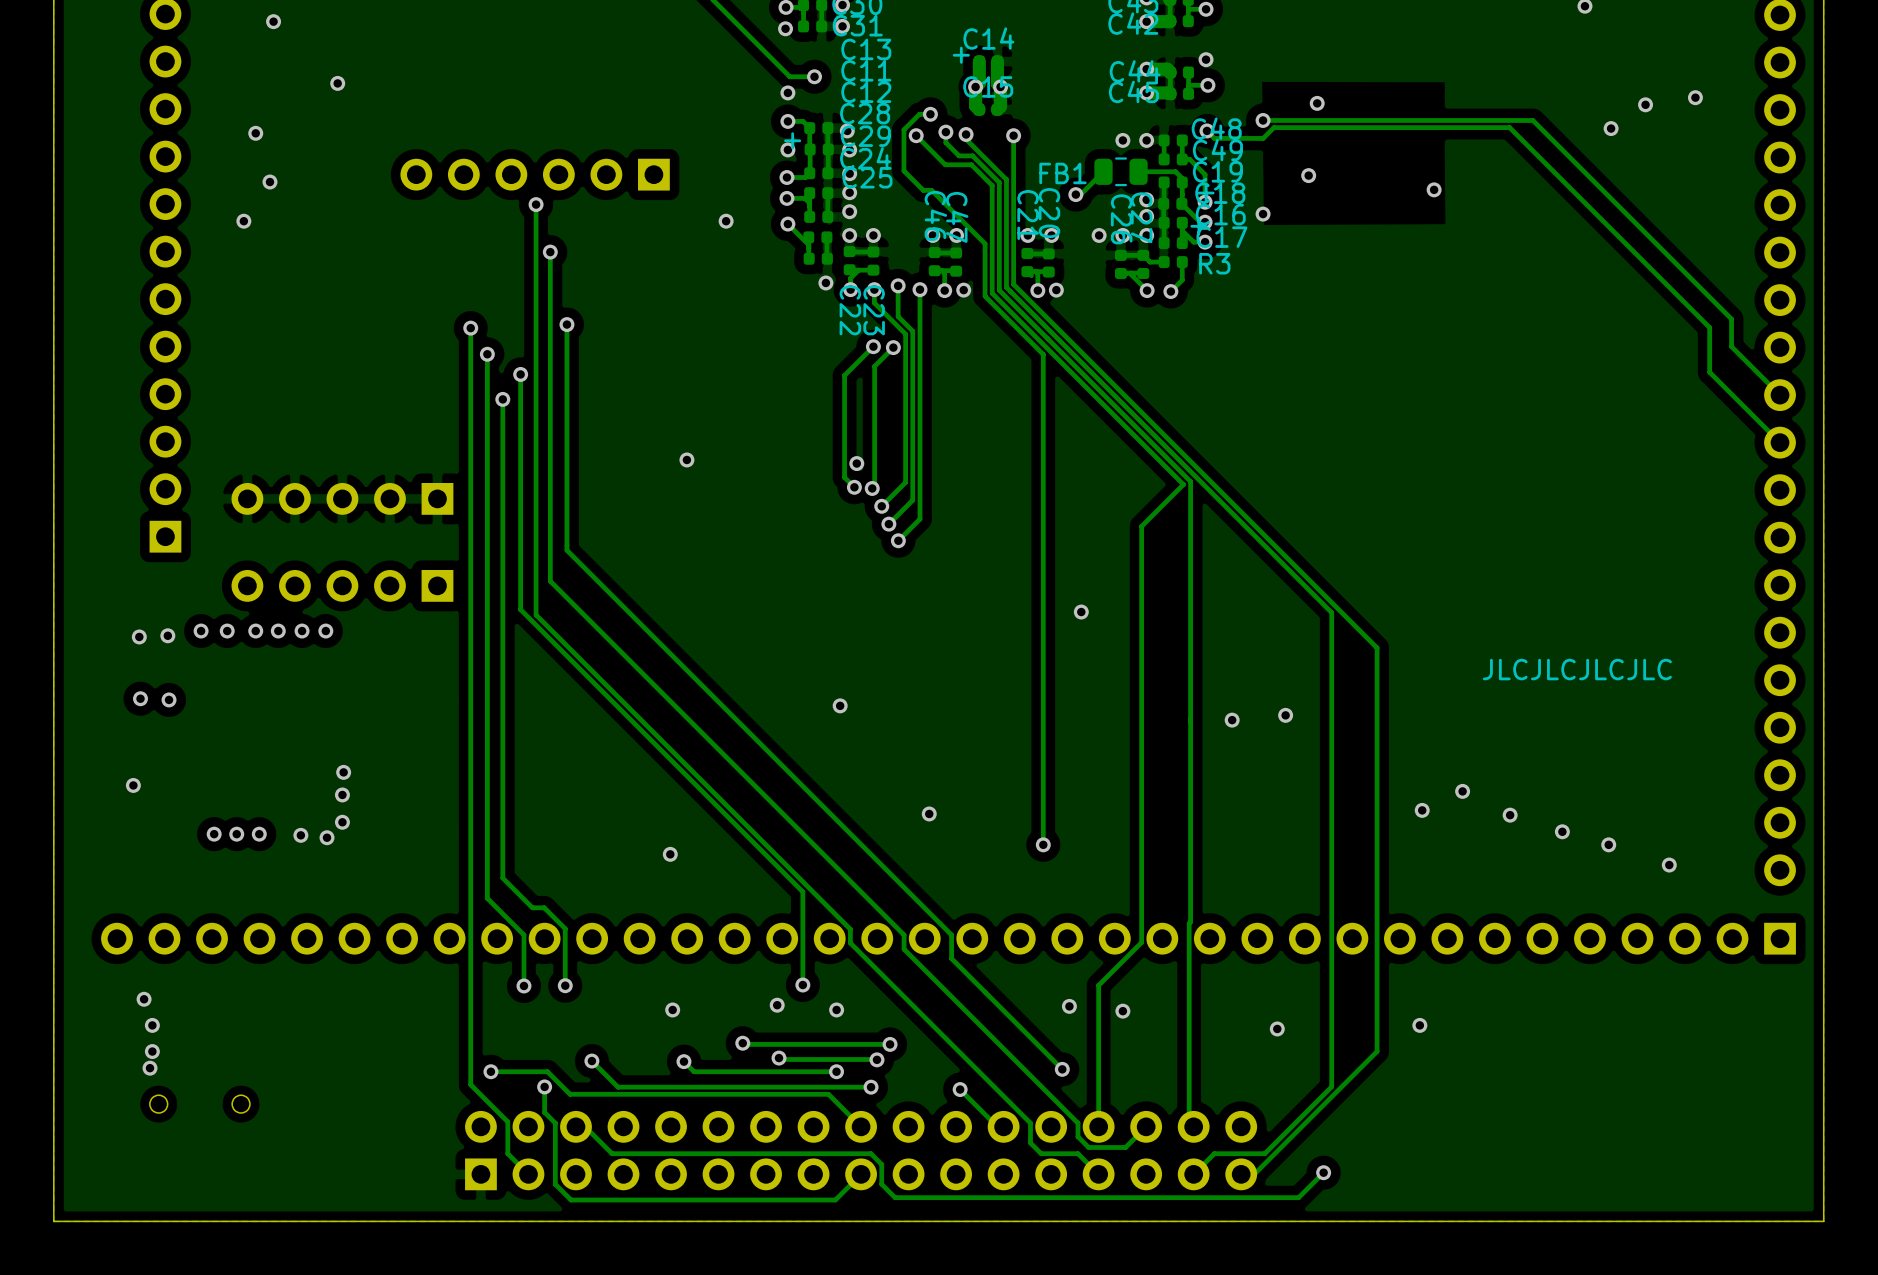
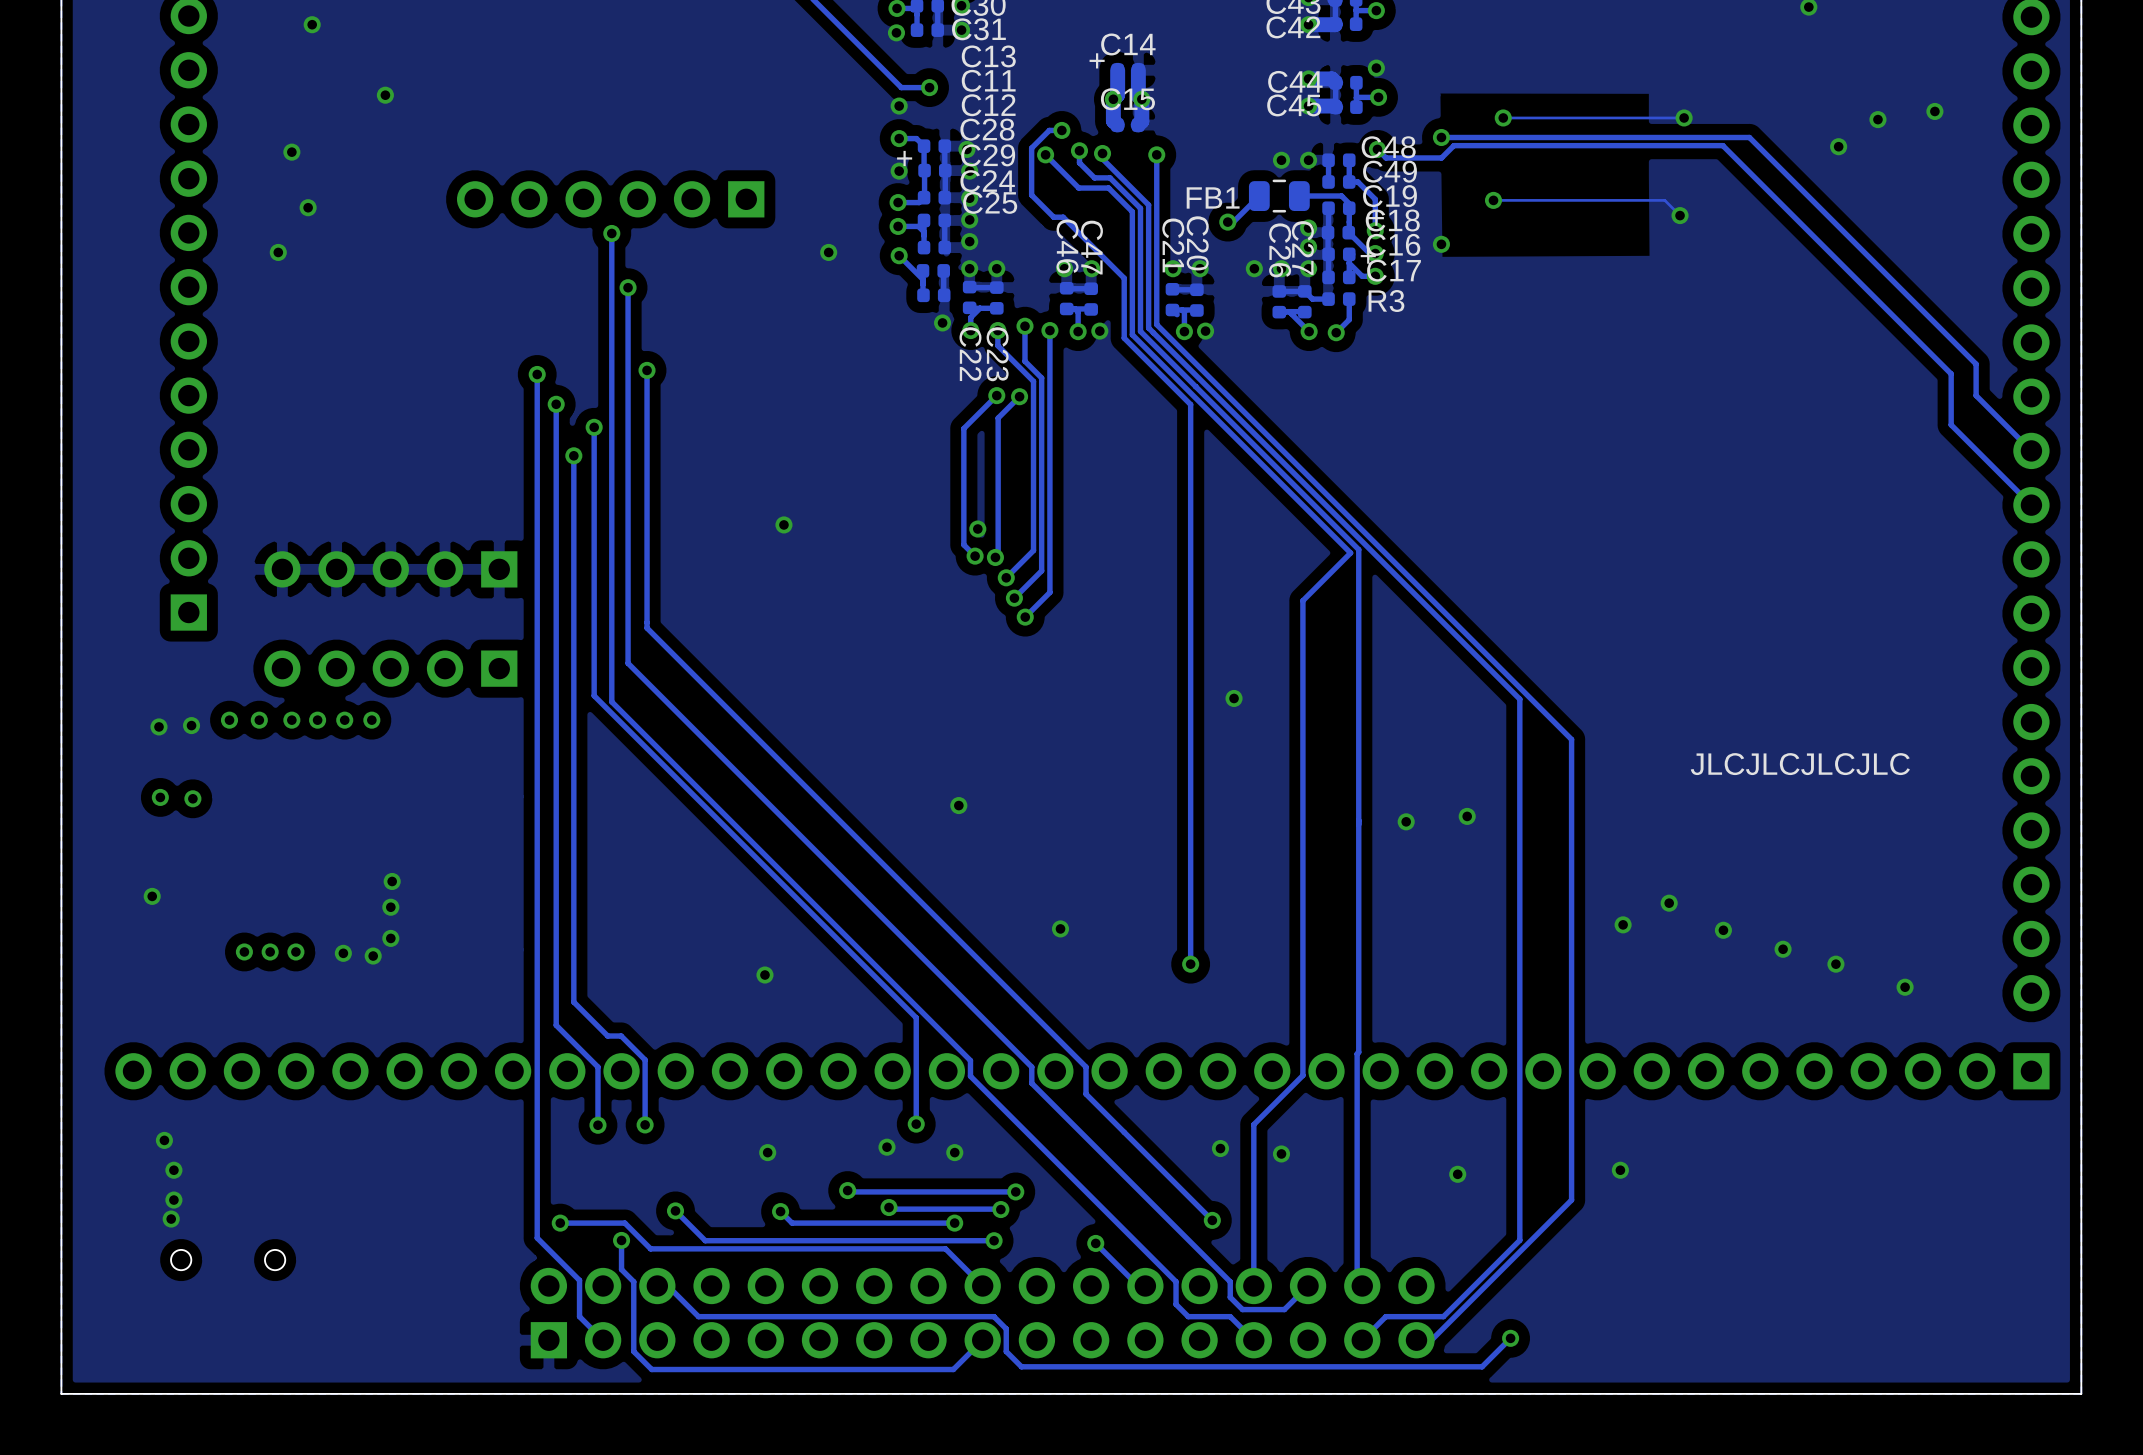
track: none -> (1684, 117) (1503, 117)
via: none -> (1684, 117)
track: none -> (1493, 200) (1664, 200) (1680, 215)
via position: (1434, 189) -> (1680, 215)

